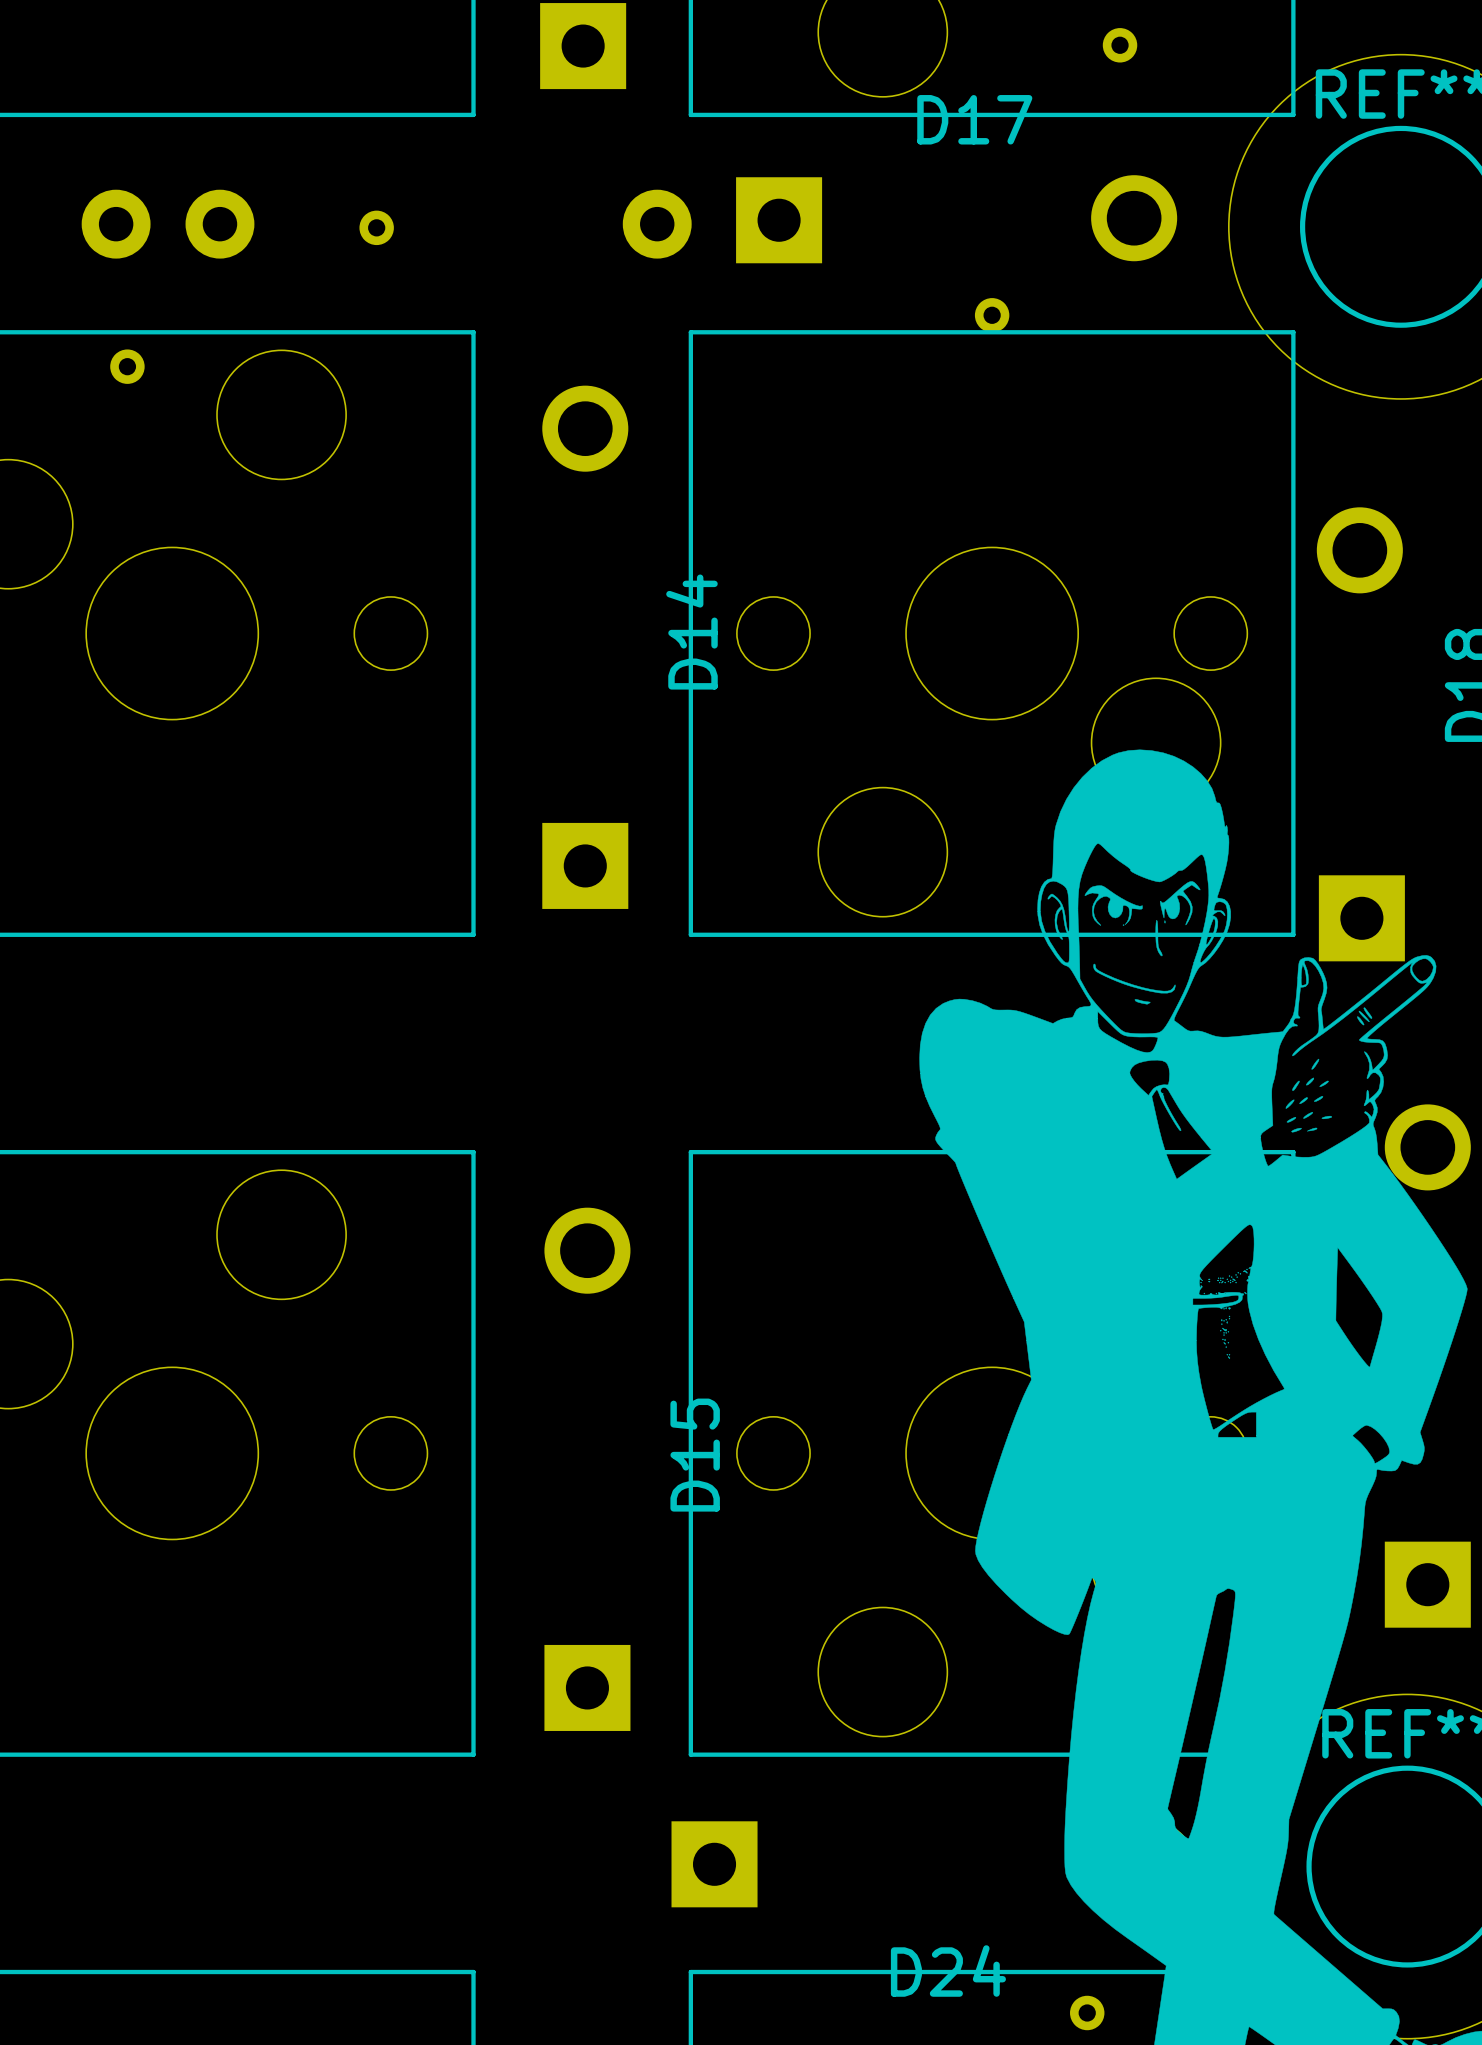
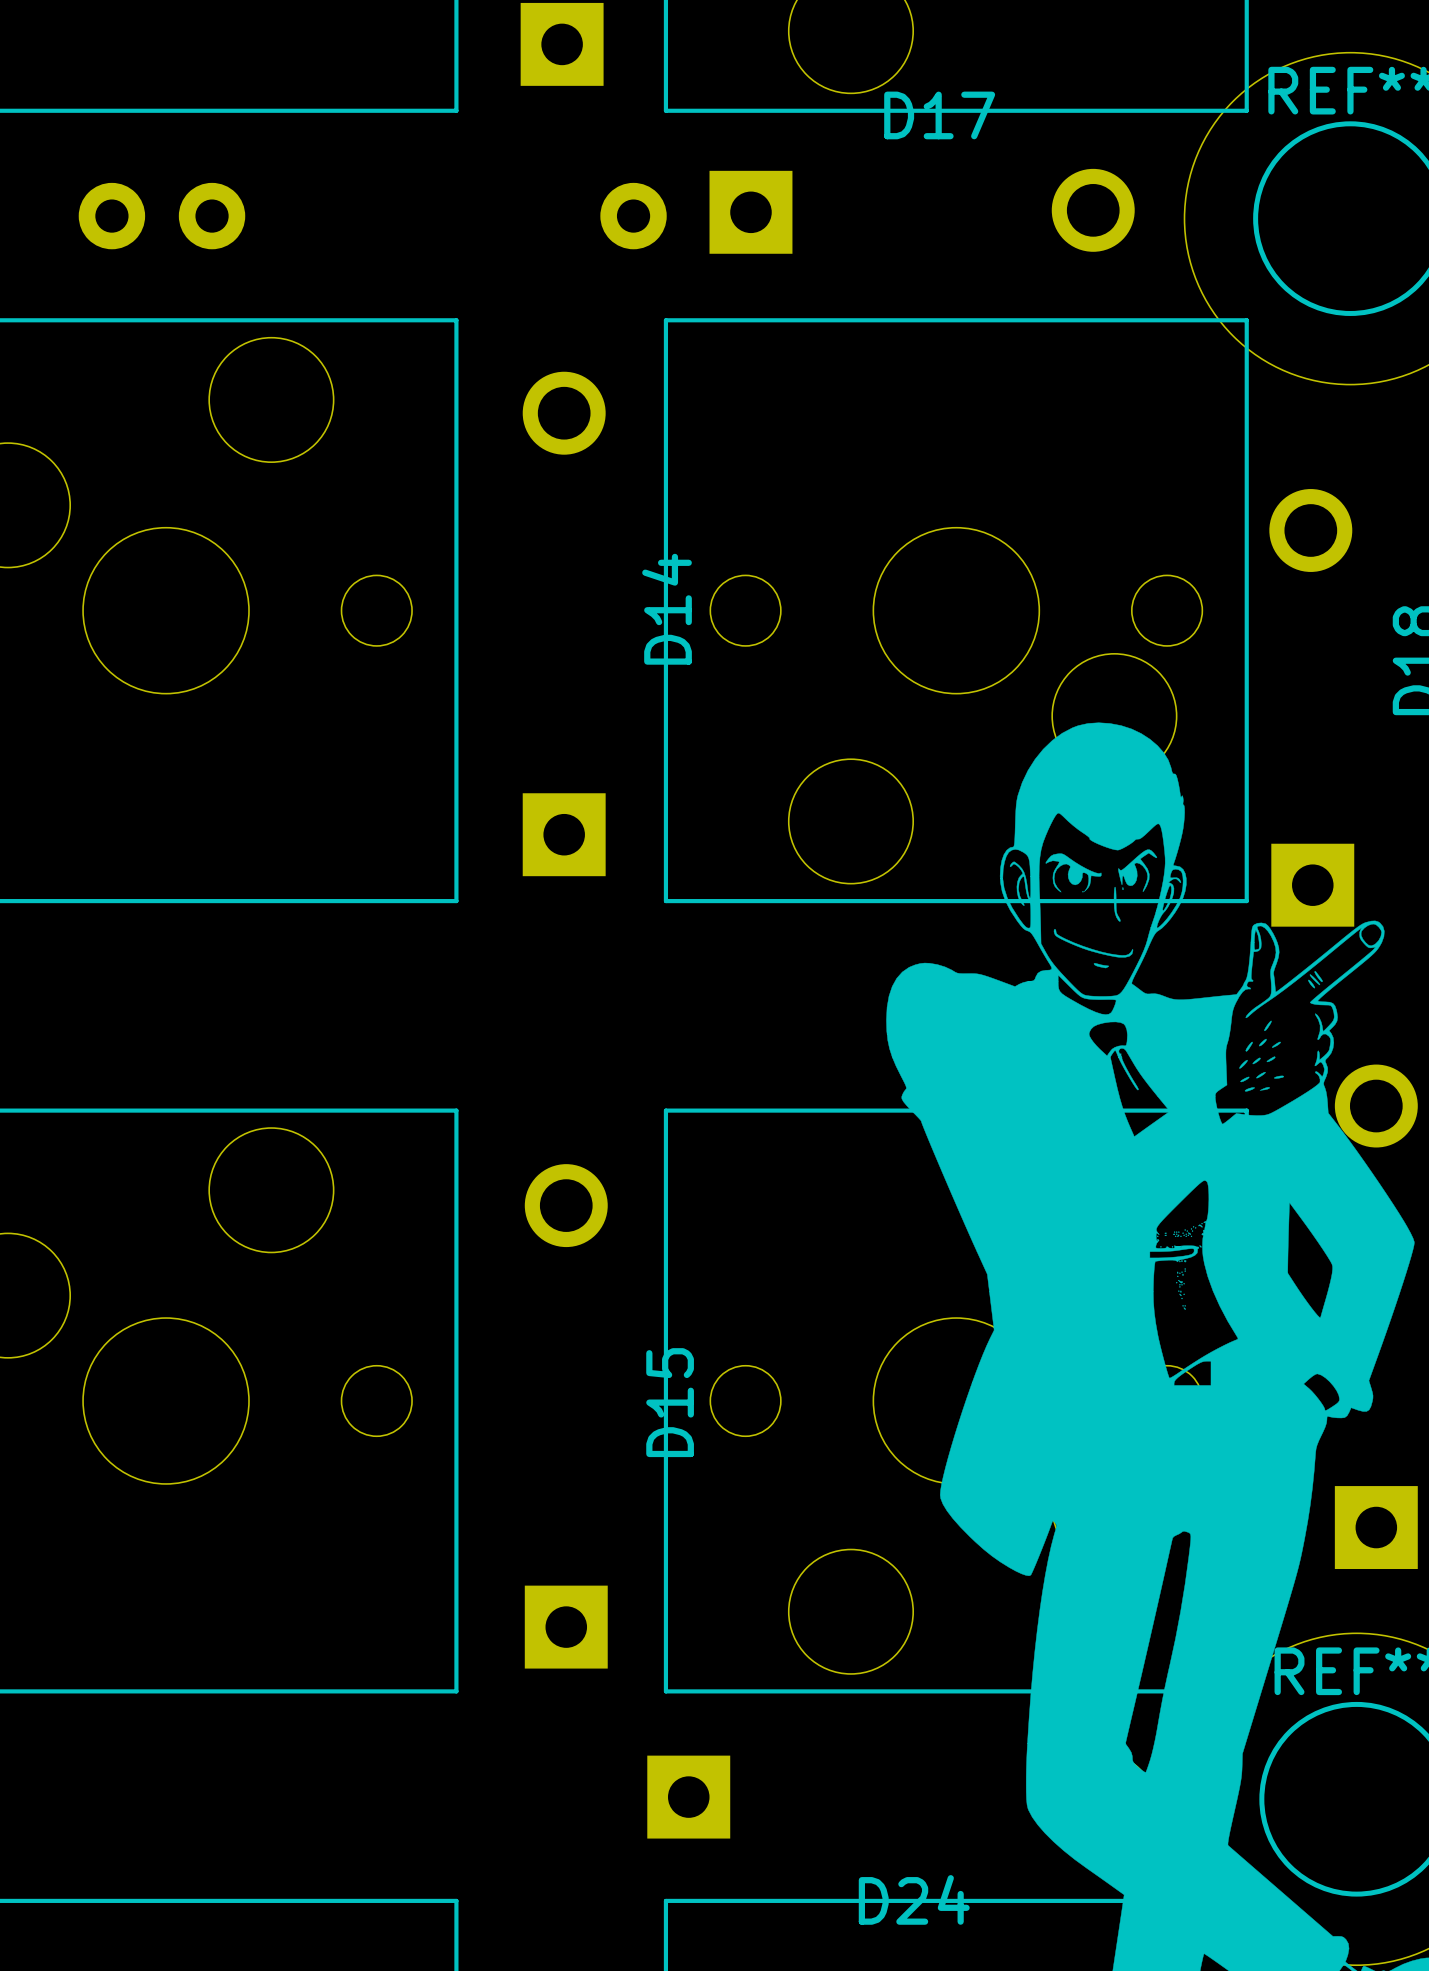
part: (1120, 45) -> none
part: (376, 227) -> none
part: (992, 315) -> none
part: (127, 366) -> none
part: (1087, 2012) -> none

